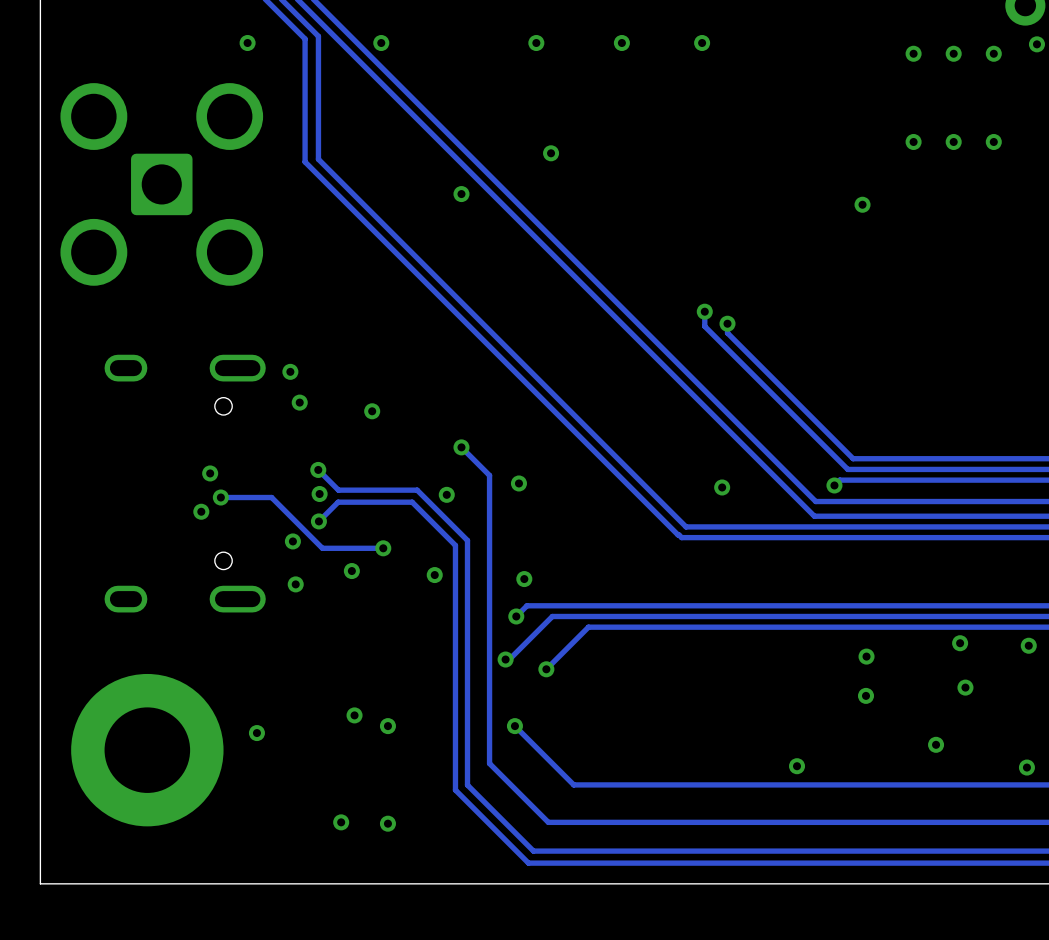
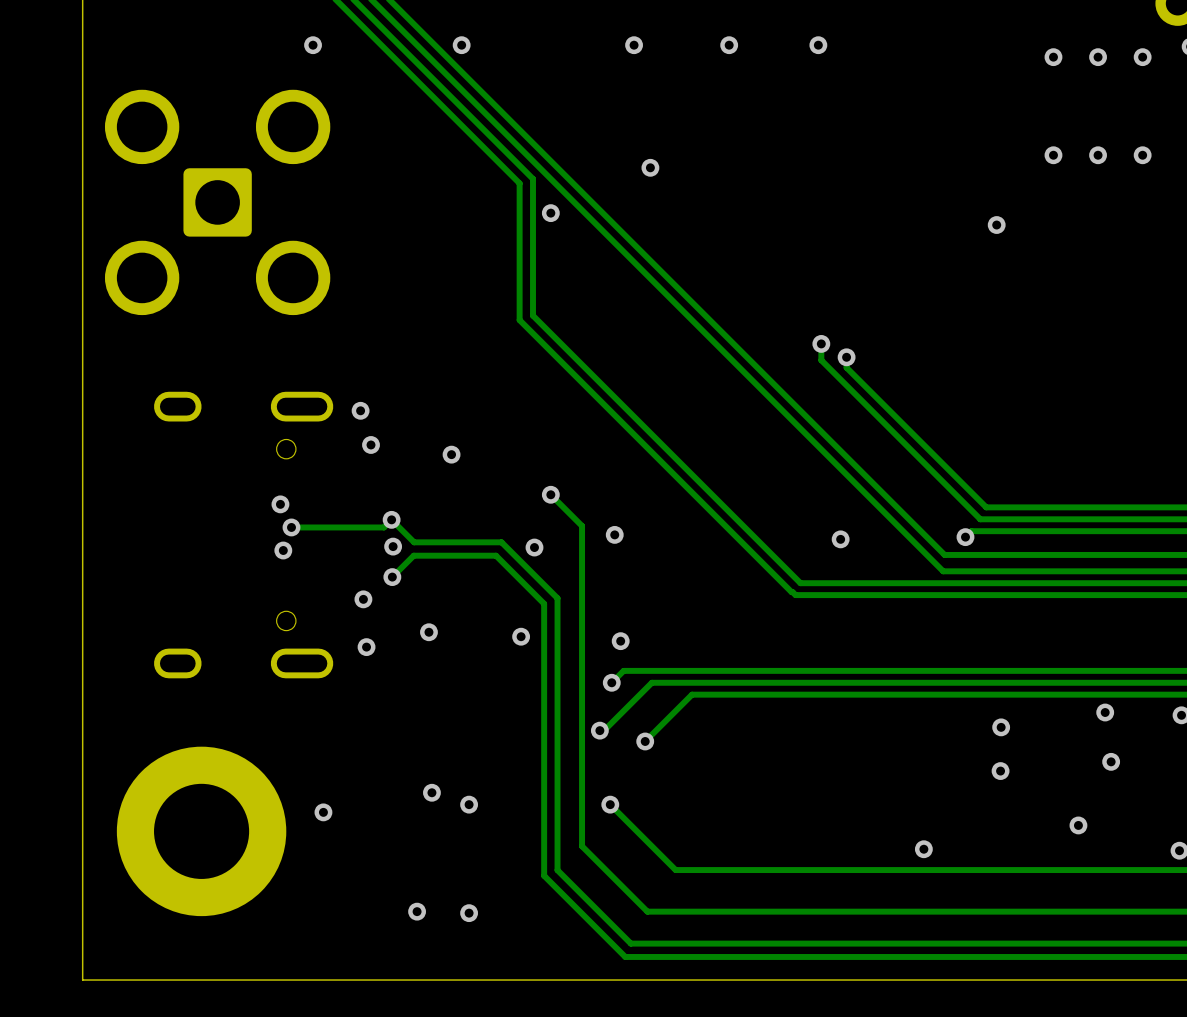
track: (318, 36) (318, 159) (445, 286) -> (391, 37) (533, 178) (533, 315)
track: (305, 38) (305, 161) (433, 290) -> (376, 40) (519, 183) (519, 320)
via: none -> (280, 504)
track: none -> (391, 519) (384, 527) (291, 527)
via: (210, 473) -> none
via: none -> (291, 527)
track: (220, 497) (271, 497) (322, 548) (383, 548) -> none
via: (201, 511) -> none
via: (383, 548) -> none

